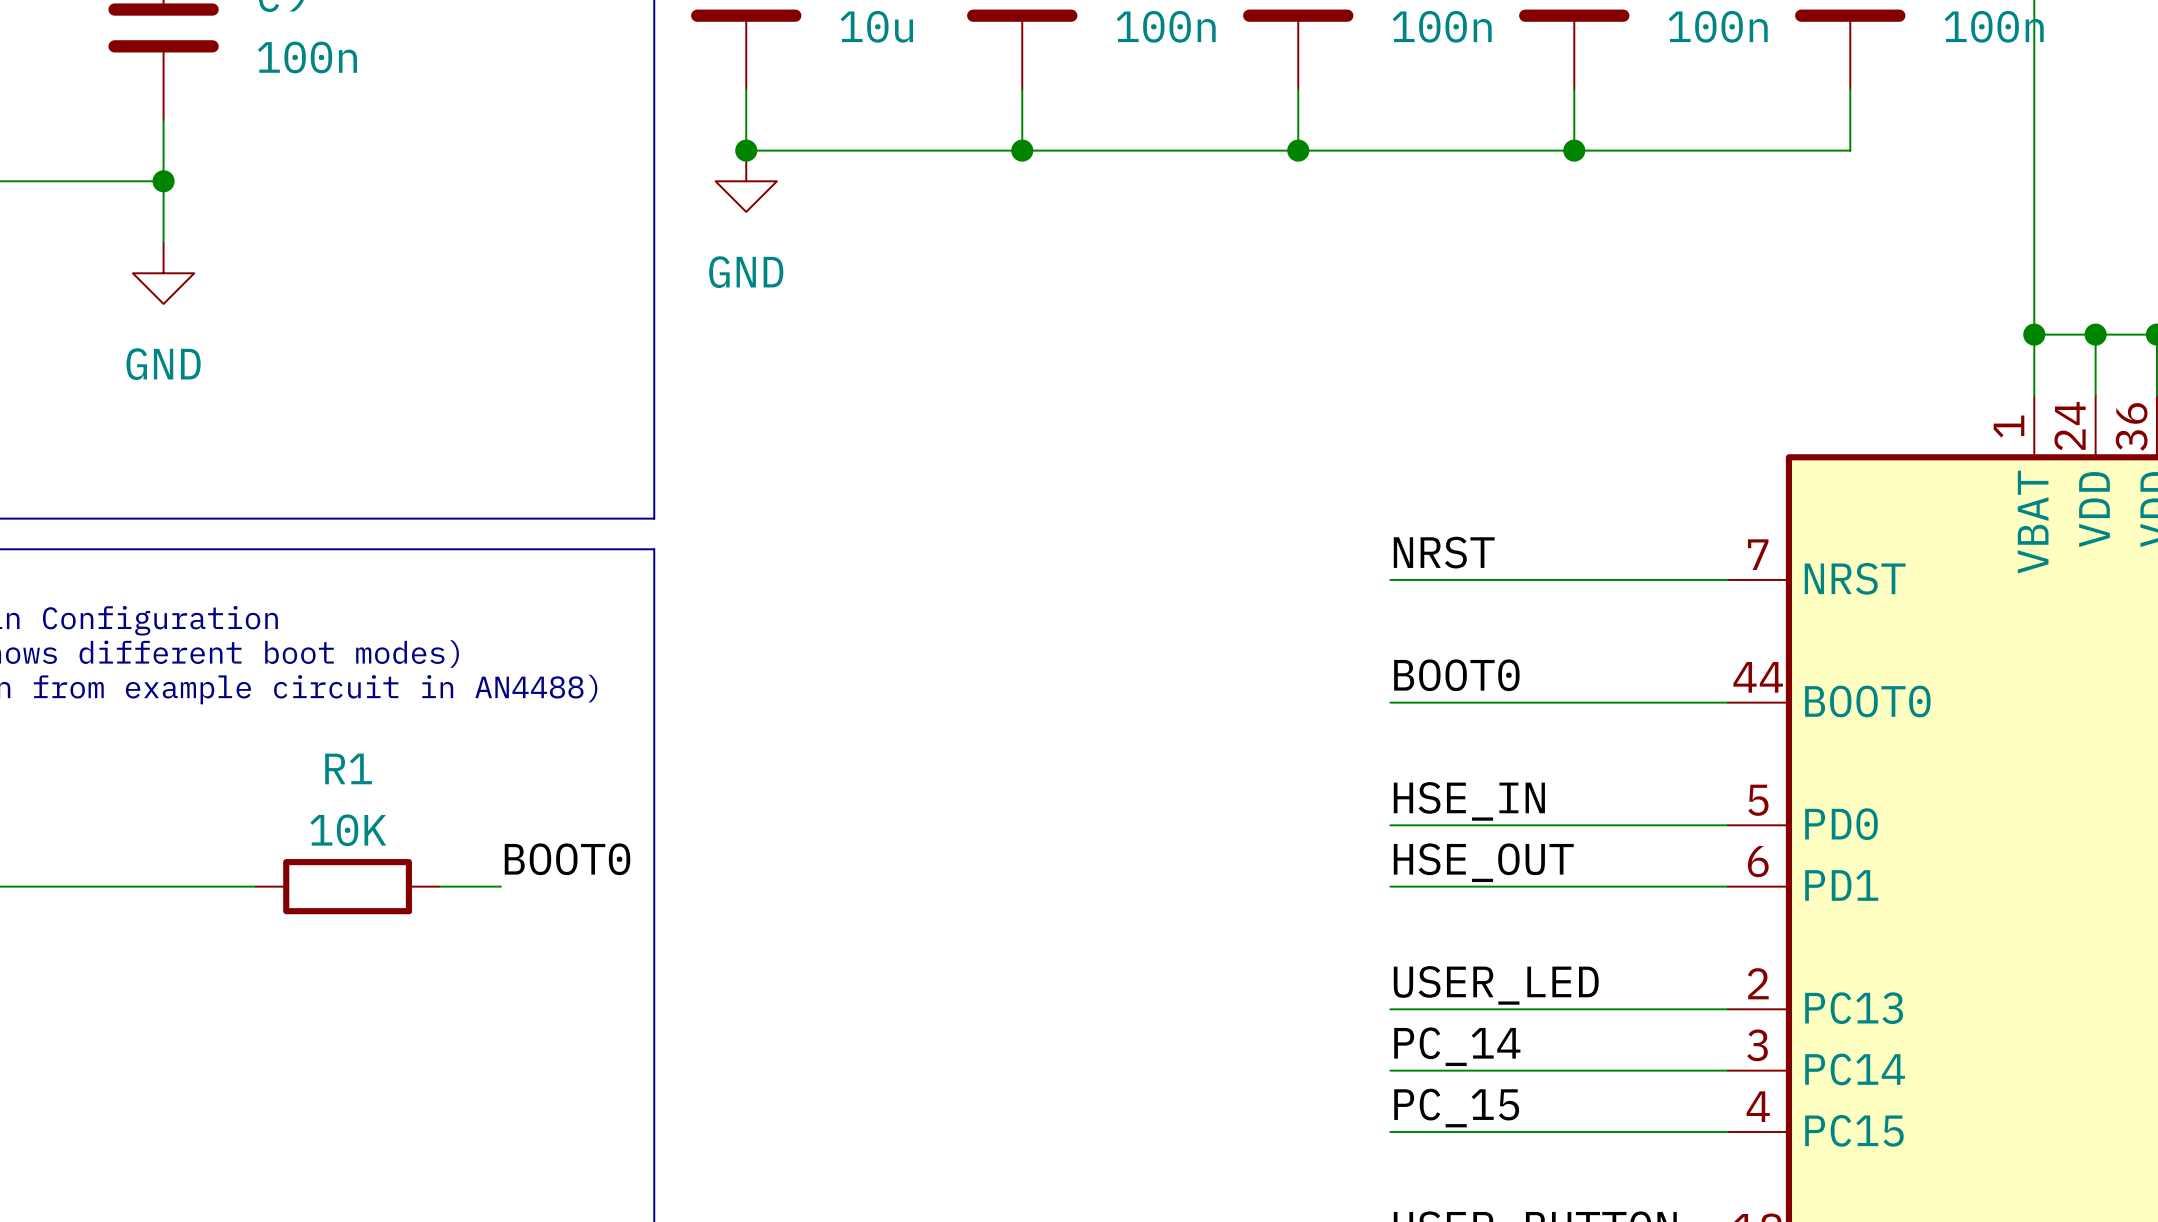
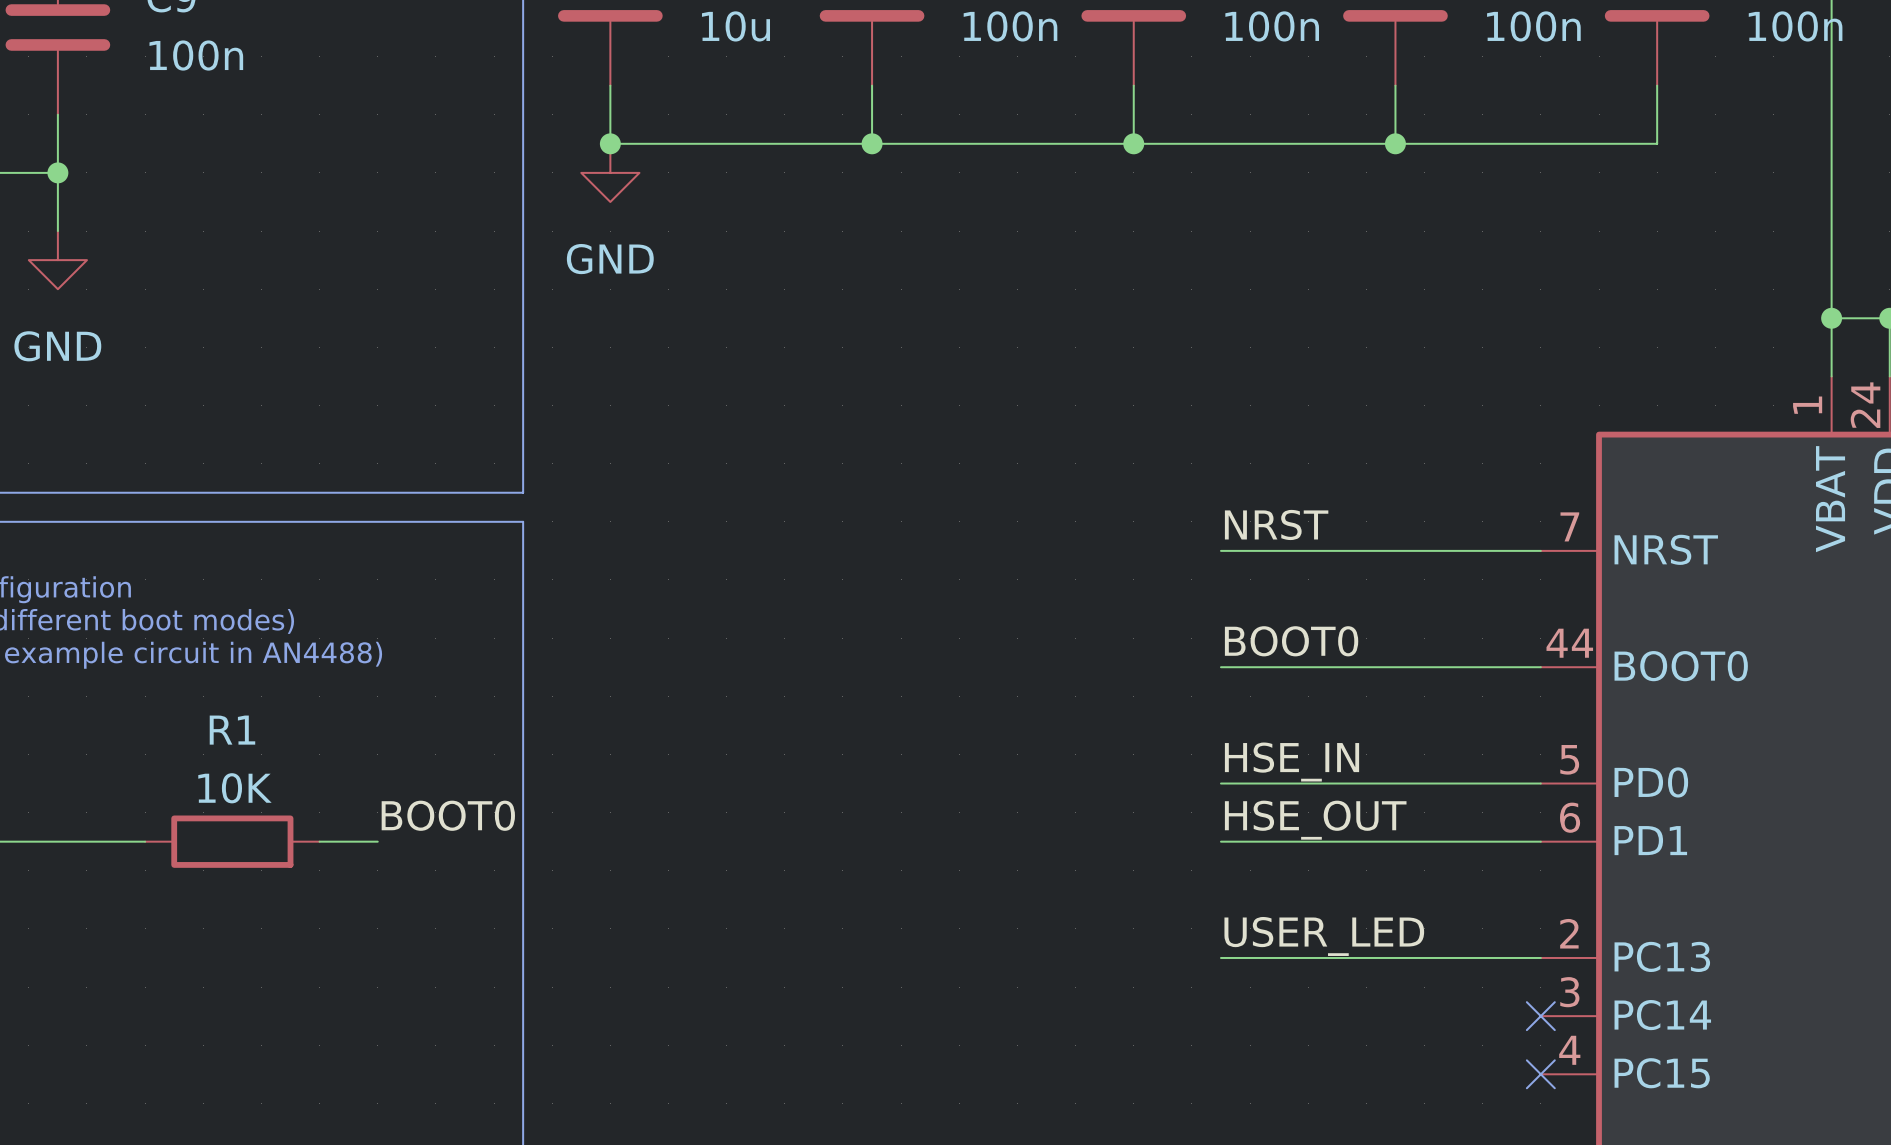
label: PC_14 (1457, 1046) -> none
wire: (1390, 1070) (1727, 1070) -> none
no-connect mark: none -> (1540, 1016)
label: PC_15 (1456, 1108) -> none
wire: (1390, 1131) (1727, 1131) -> none
no-connect mark: none -> (1540, 1074)

